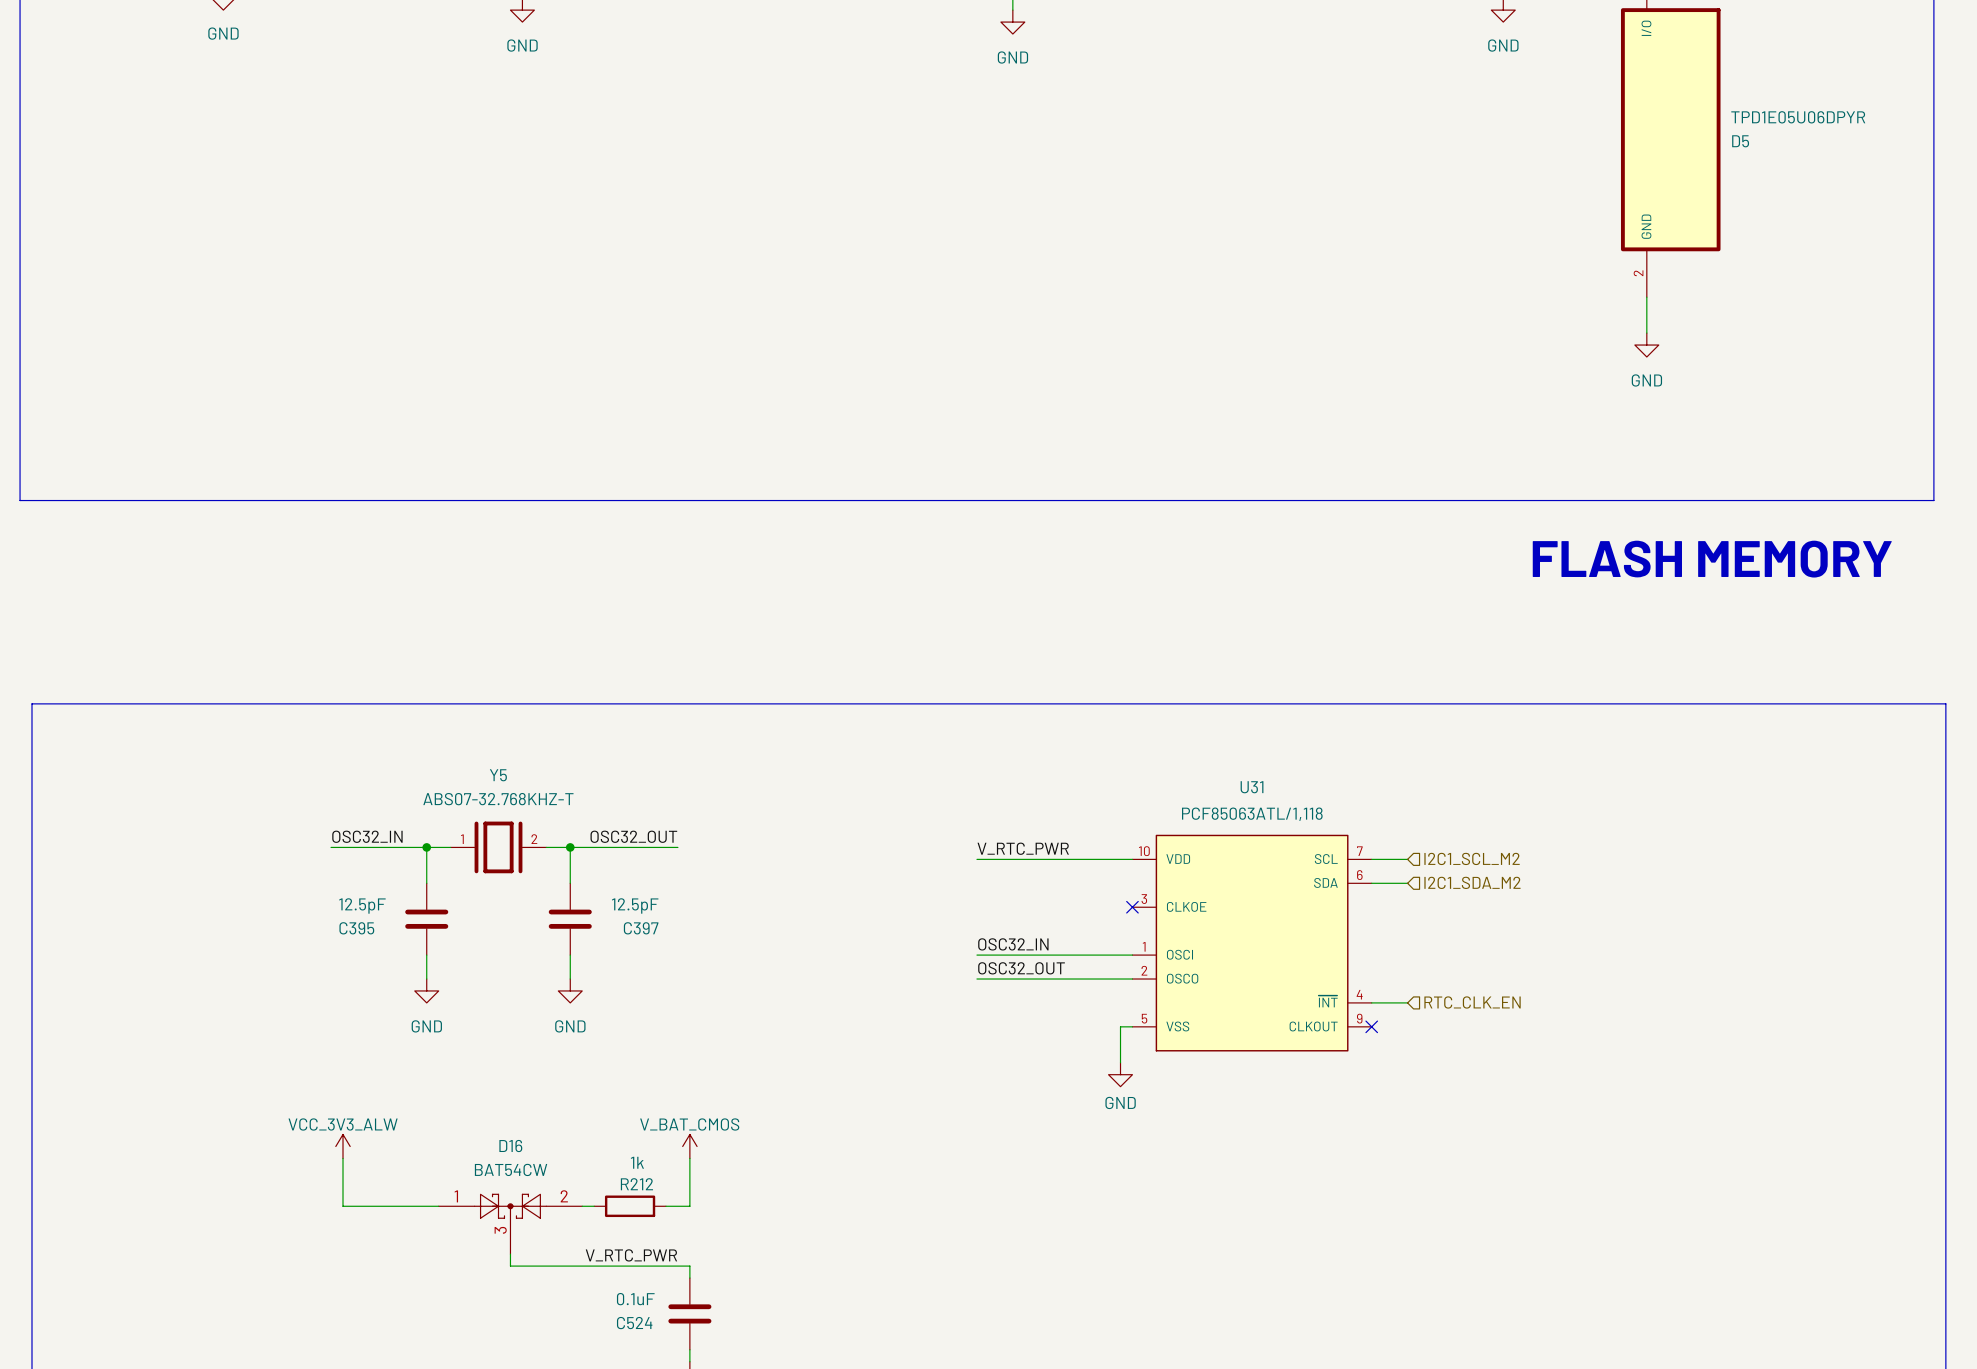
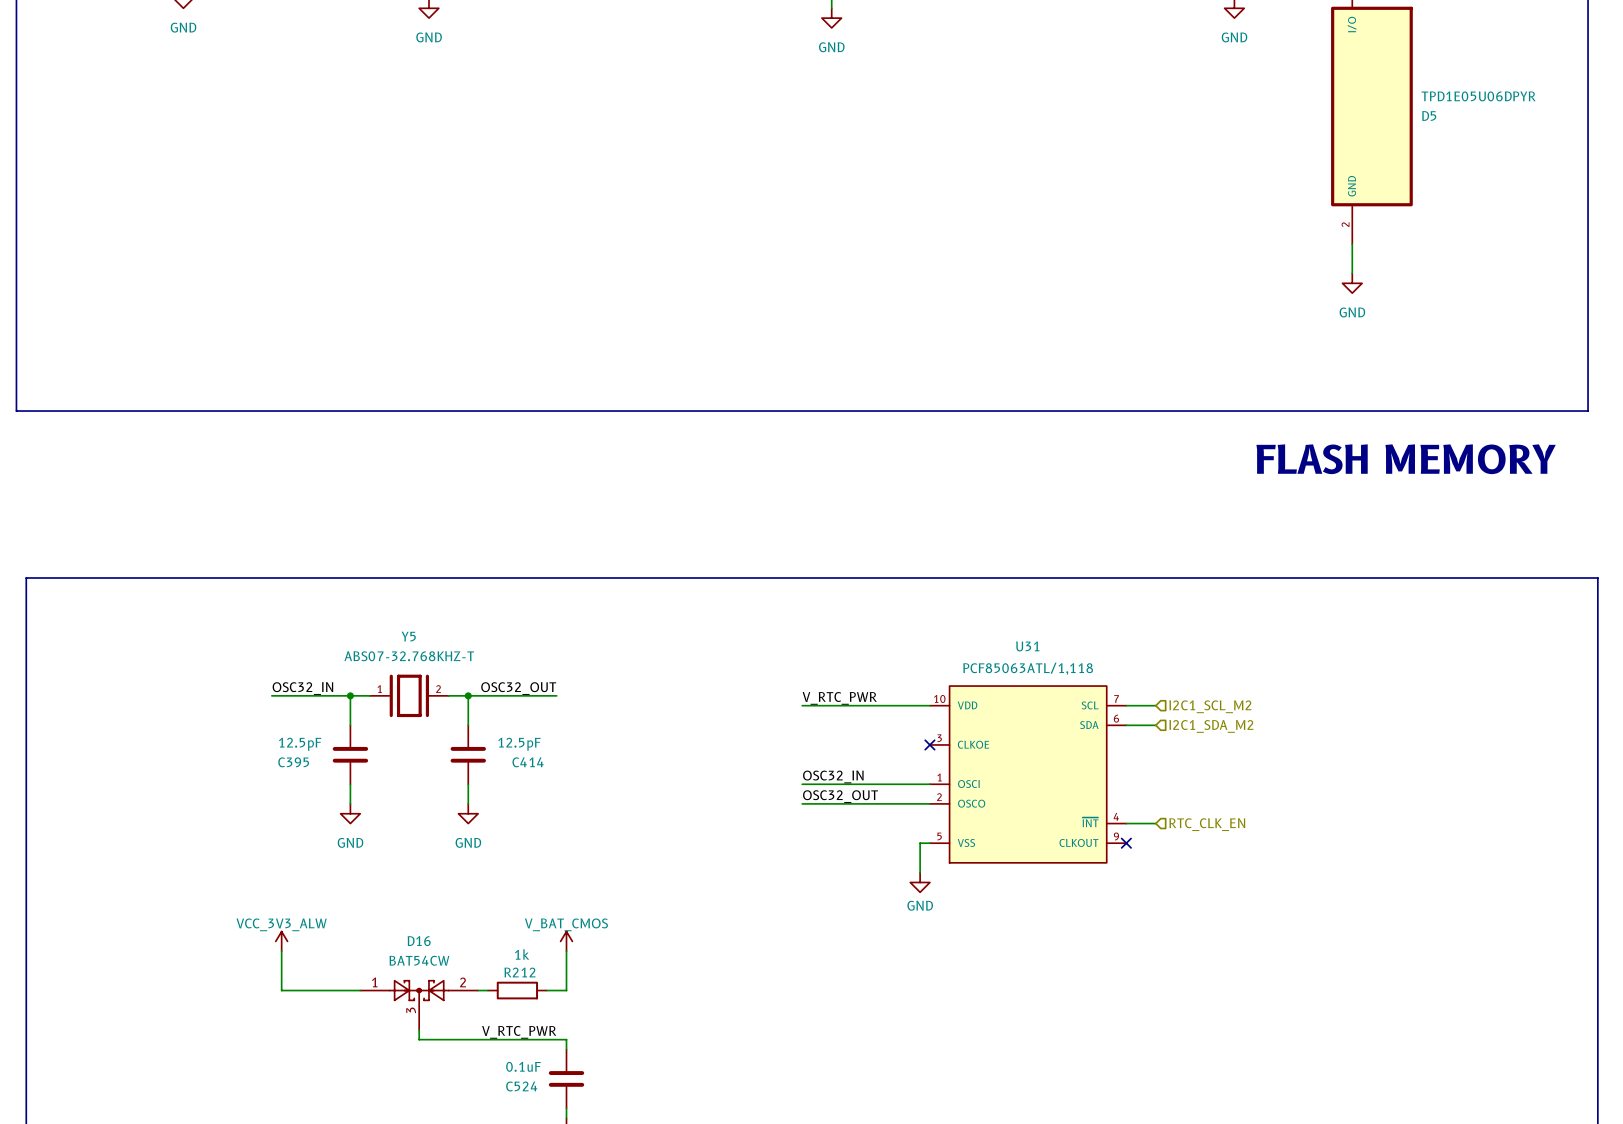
C397 name: C397 (641, 928) -> C414 (528, 762)

